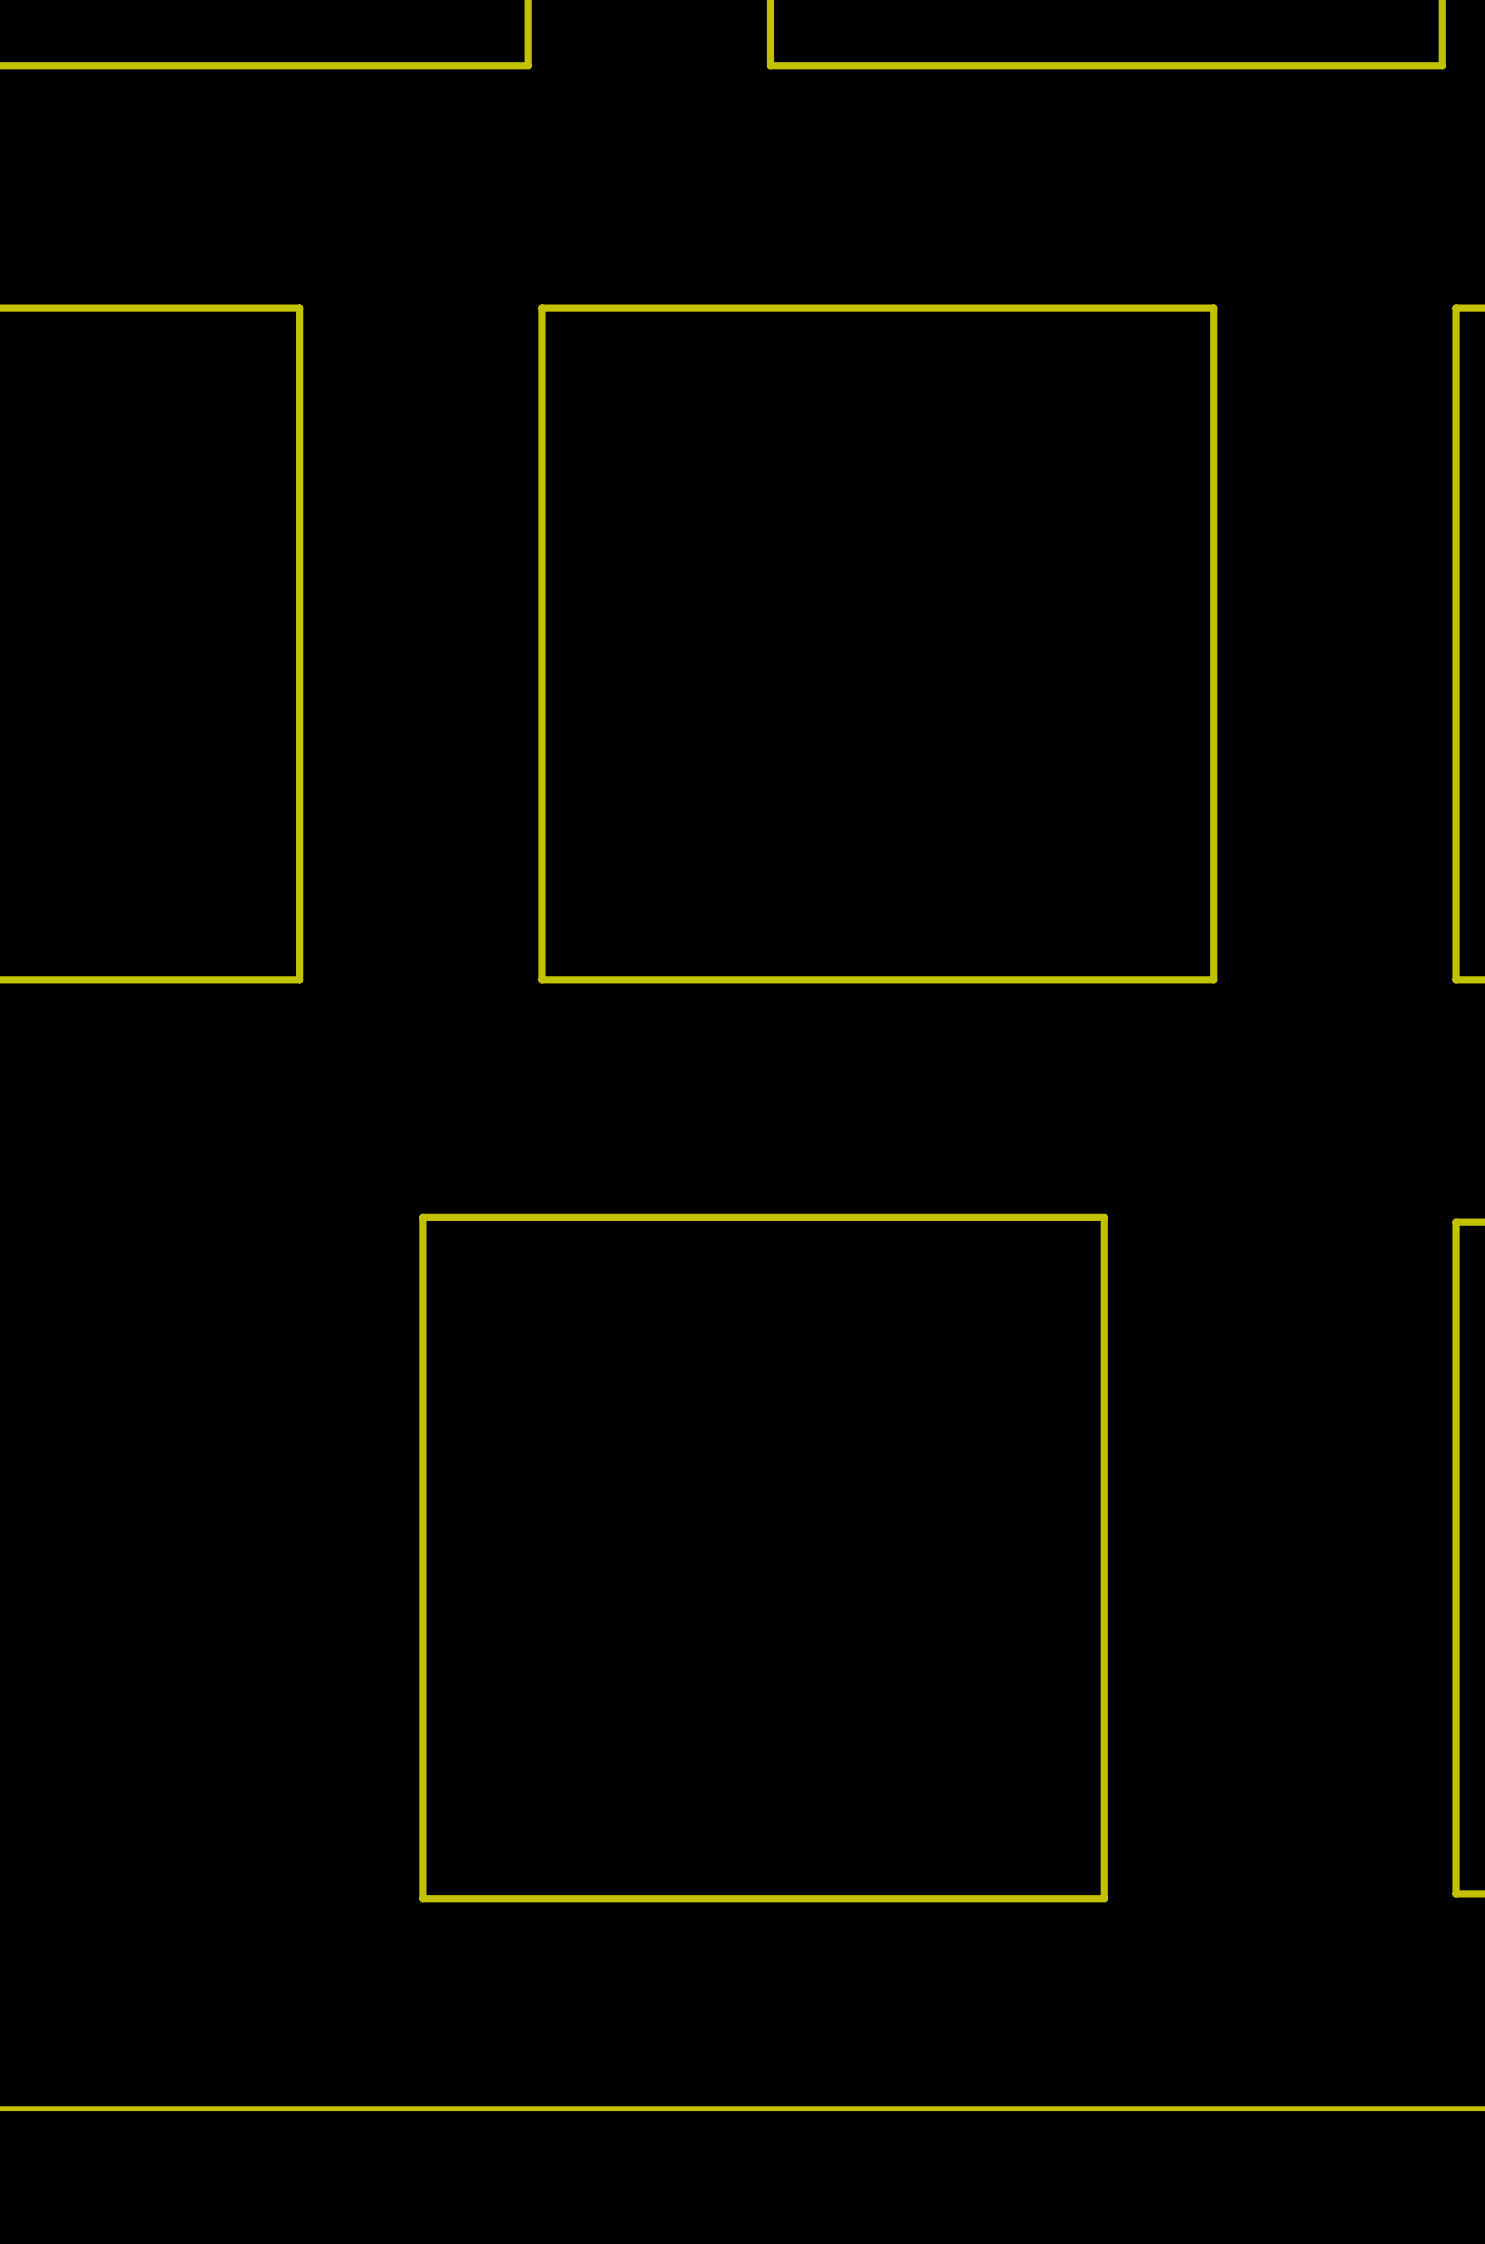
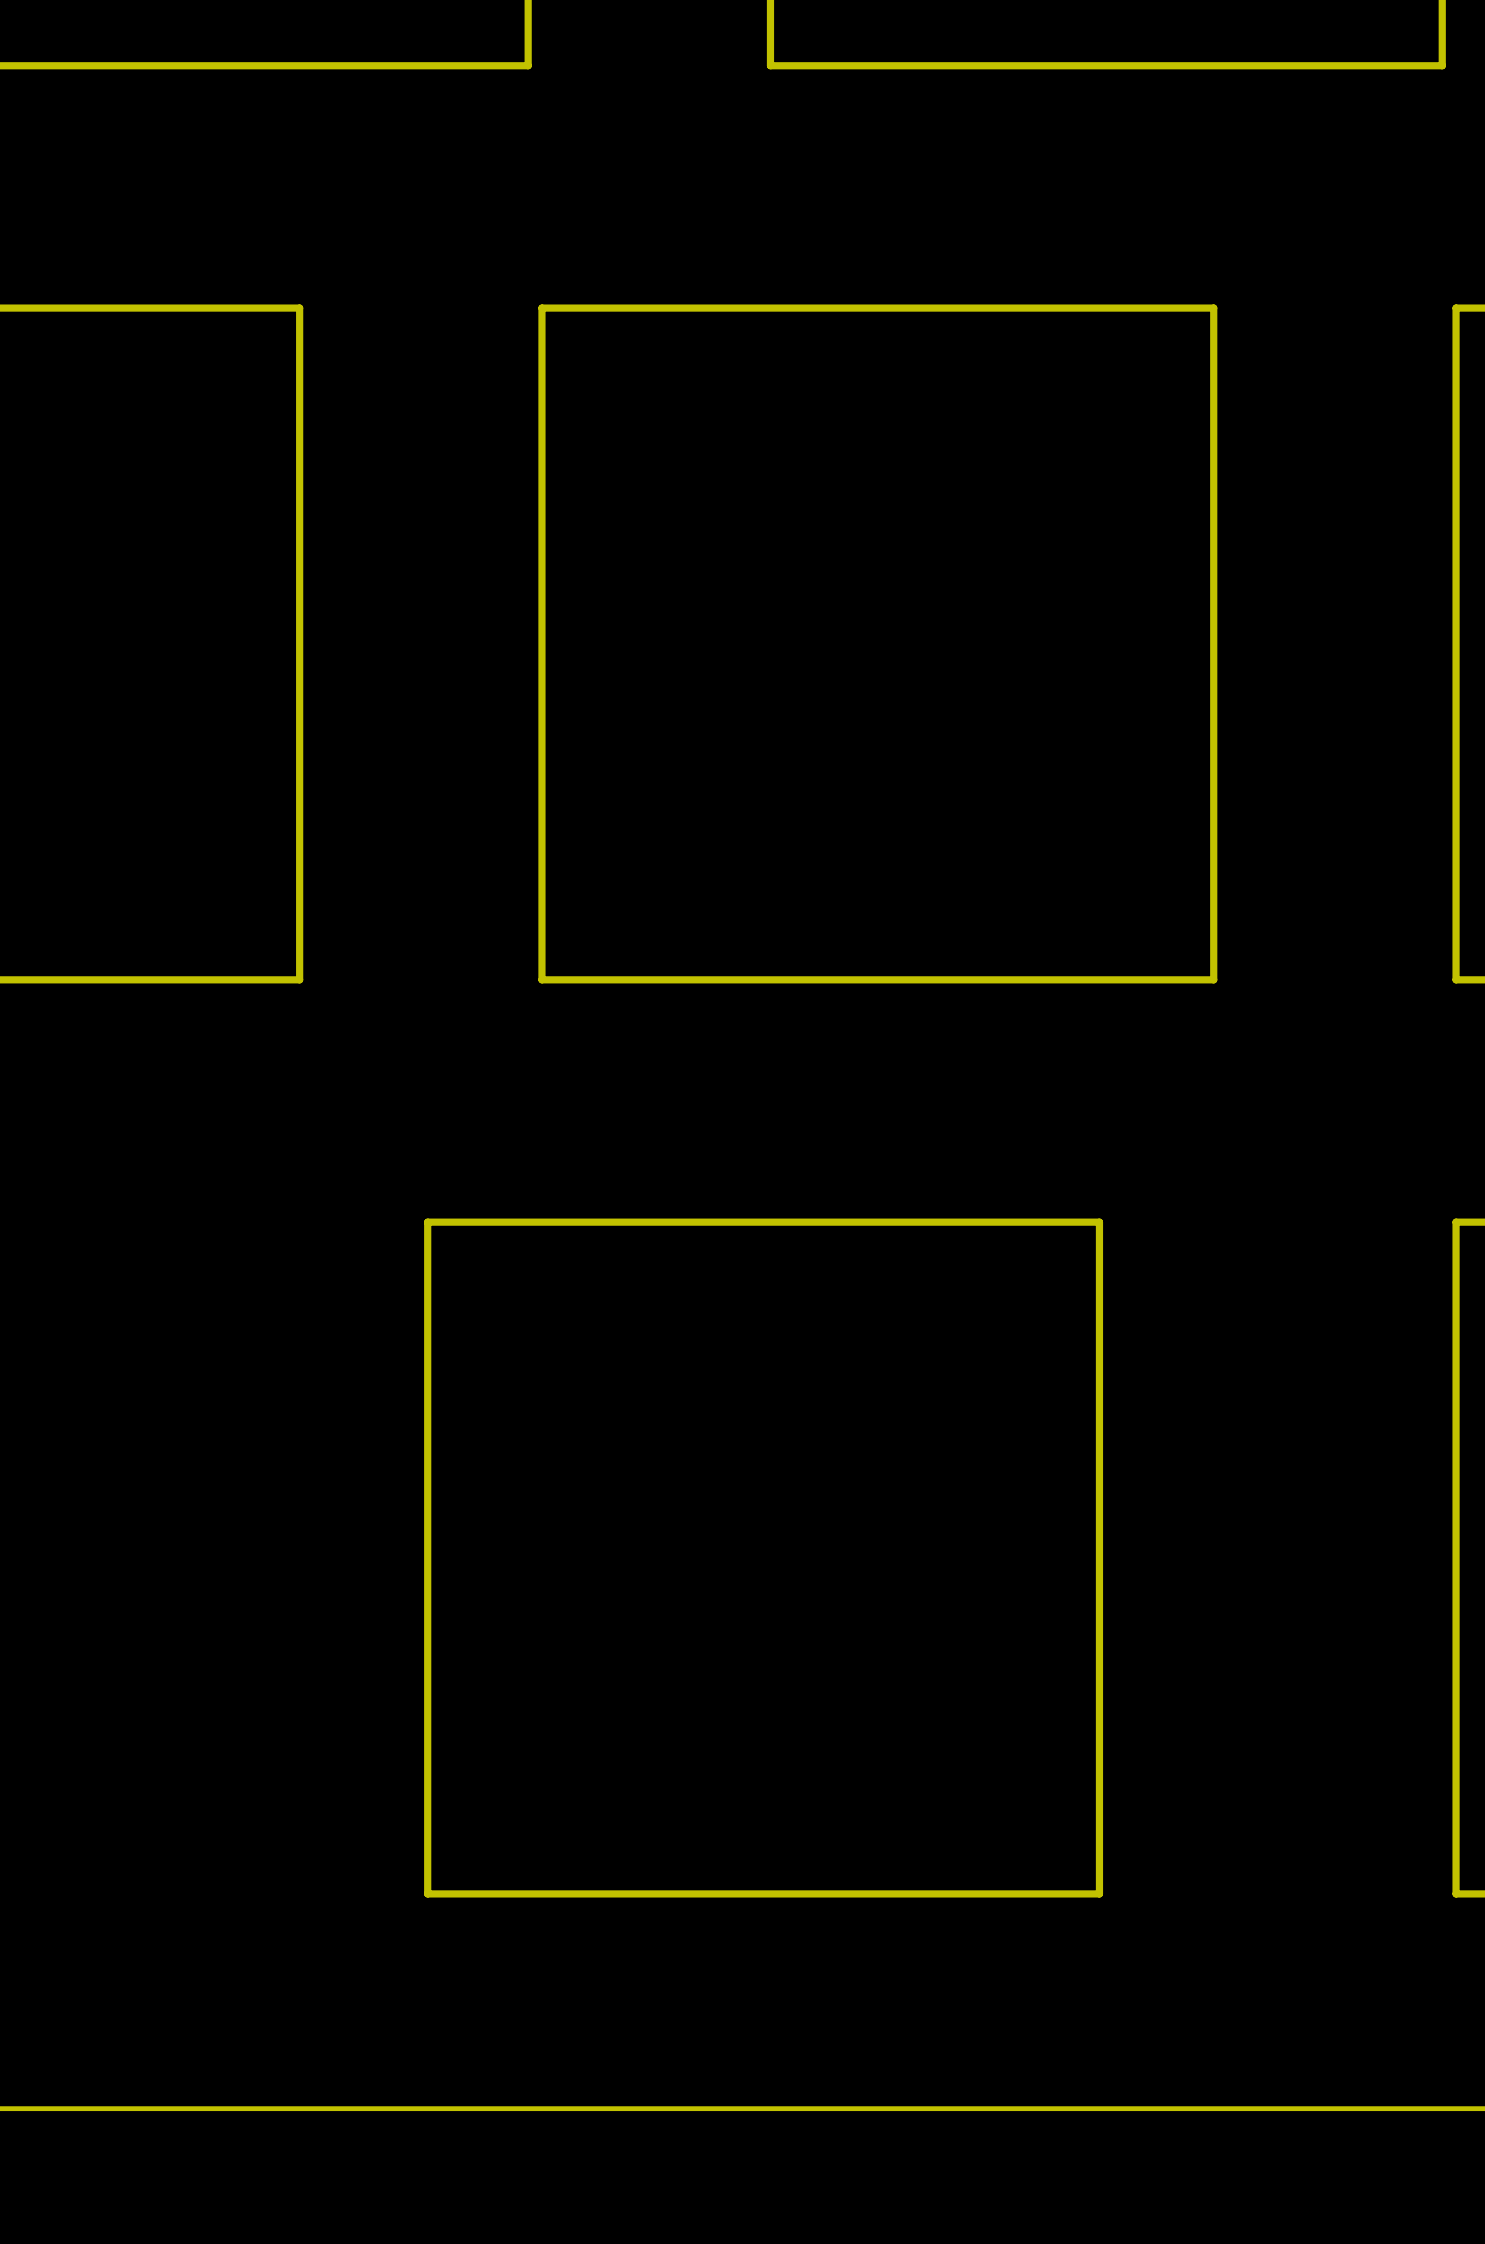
drawing shape: [419, 1213, 1108, 1903] -> [424, 1218, 1104, 1898]

